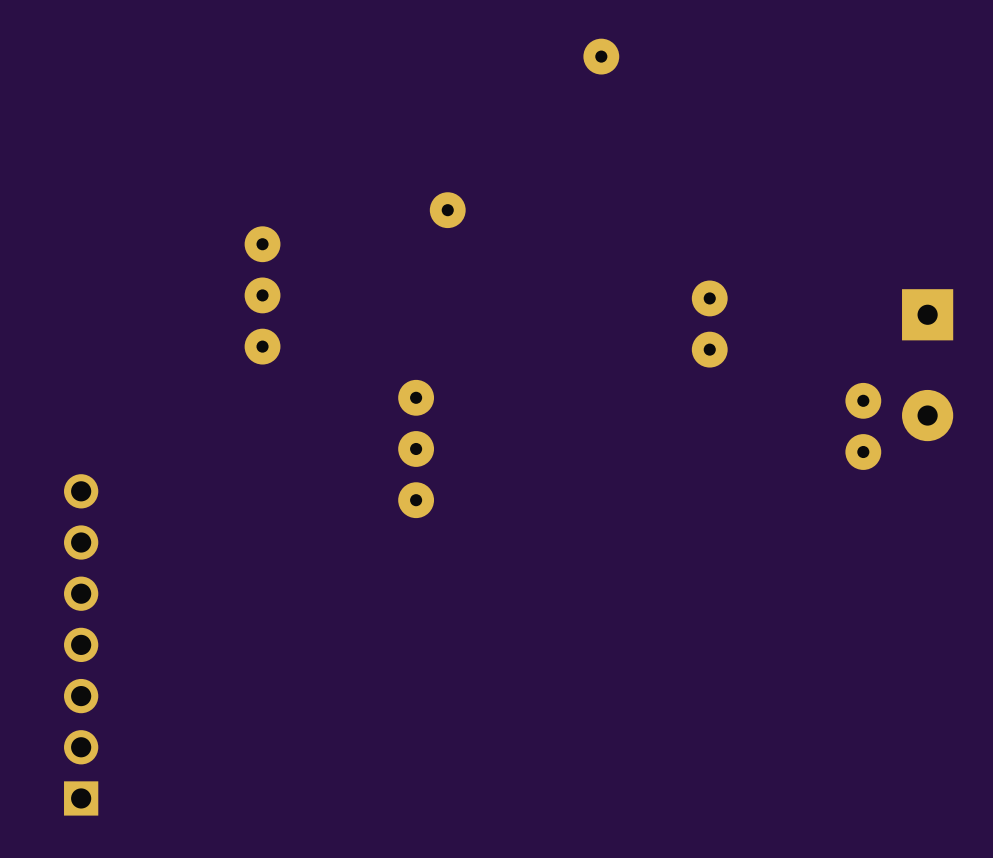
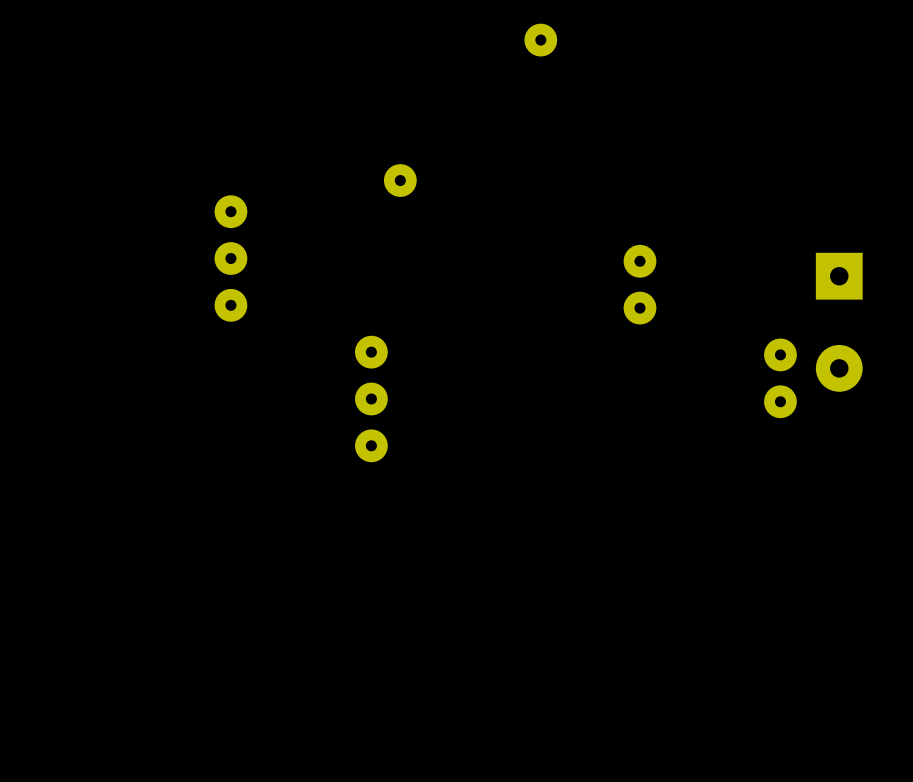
part: (81, 644) -> none

